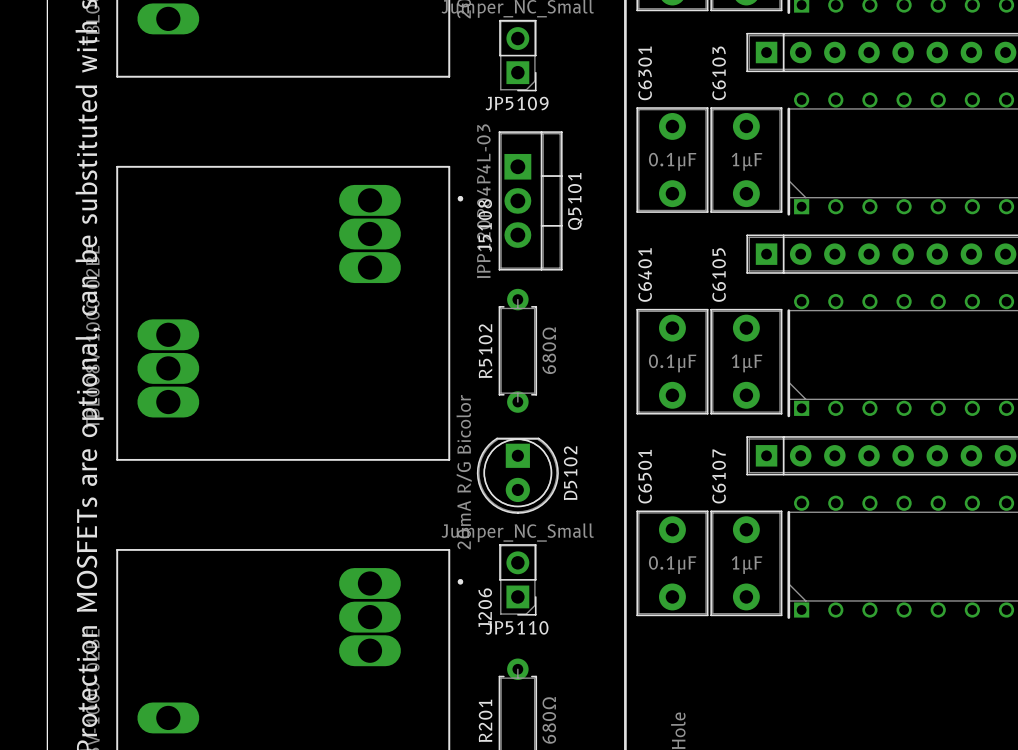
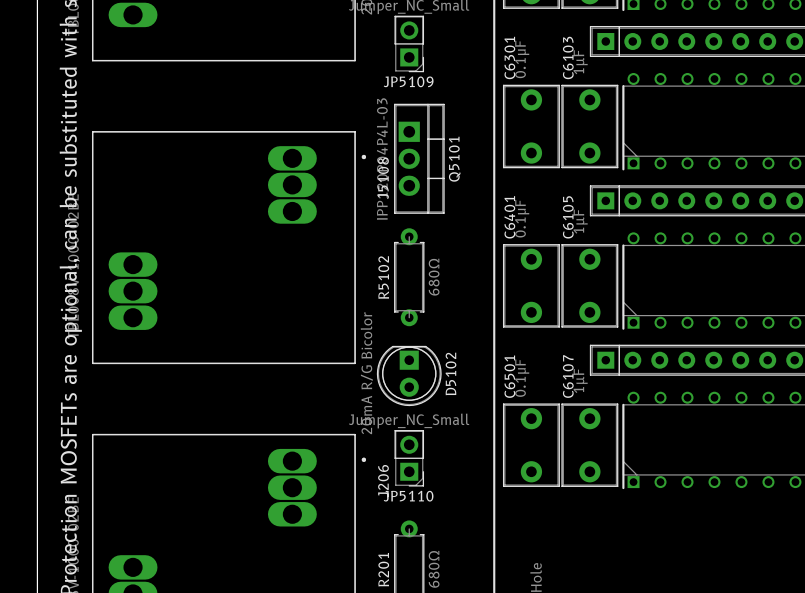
C6301 value rotation: 0° (672, 161) -> 90° counterclockwise (522, 59)
C6301 value position: 0.1μF (672, 161) -> 0.1μF (522, 59)
C6103 value rotation: 0° (747, 161) -> 90° counterclockwise (580, 62)
C6103 value position: 1µF (747, 161) -> 1µF (580, 62)
C6401 value rotation: 0° (672, 363) -> 90° counterclockwise (522, 218)
C6401 value position: 0.1μF (672, 363) -> 0.1μF (522, 218)
C6105 value rotation: 0° (747, 363) -> 90° counterclockwise (580, 221)
C6105 value position: 1µF (747, 363) -> 1µF (580, 221)
C6501 value rotation: 0° (672, 565) -> 90° counterclockwise (522, 378)
C6501 value position: 0.1μF (672, 565) -> 0.1μF (522, 378)
C6107 value rotation: 0° (747, 565) -> 90° counterclockwise (580, 380)
C6107 value position: 1µF (747, 565) -> 1µF (580, 380)

